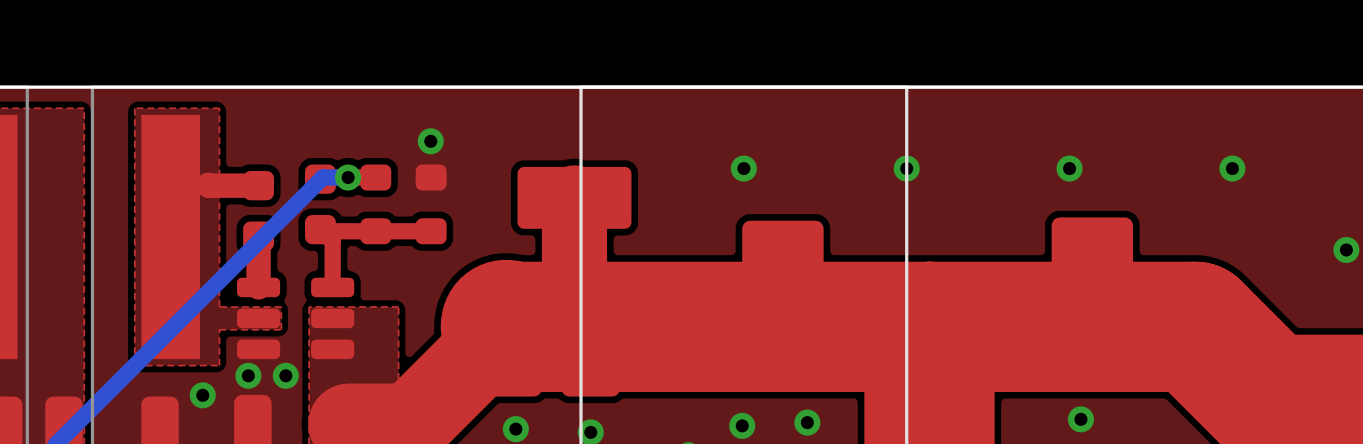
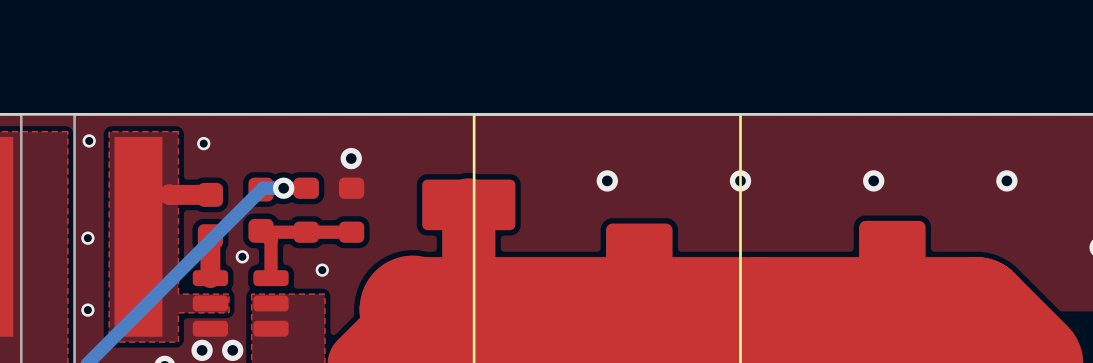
via: none -> (89, 140)
via: none -> (203, 143)
via: none -> (87, 238)
via: none -> (242, 256)
via: none -> (322, 270)
via: none -> (87, 310)

